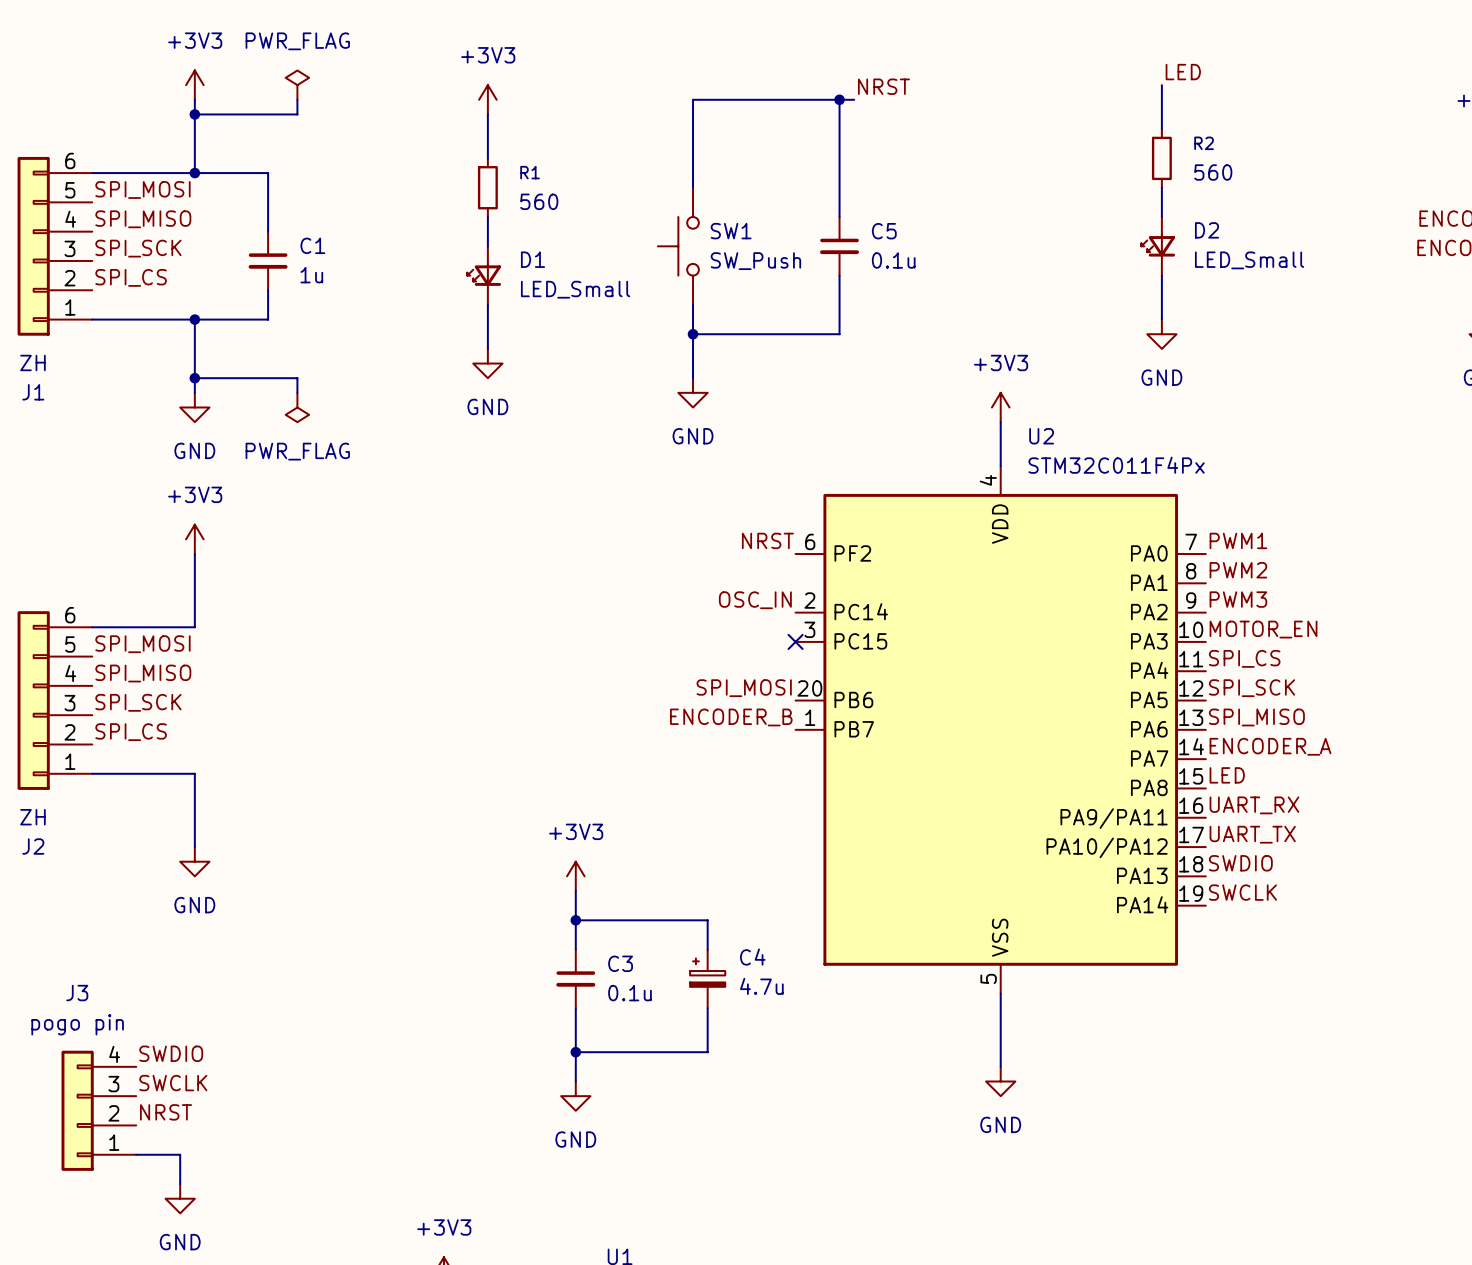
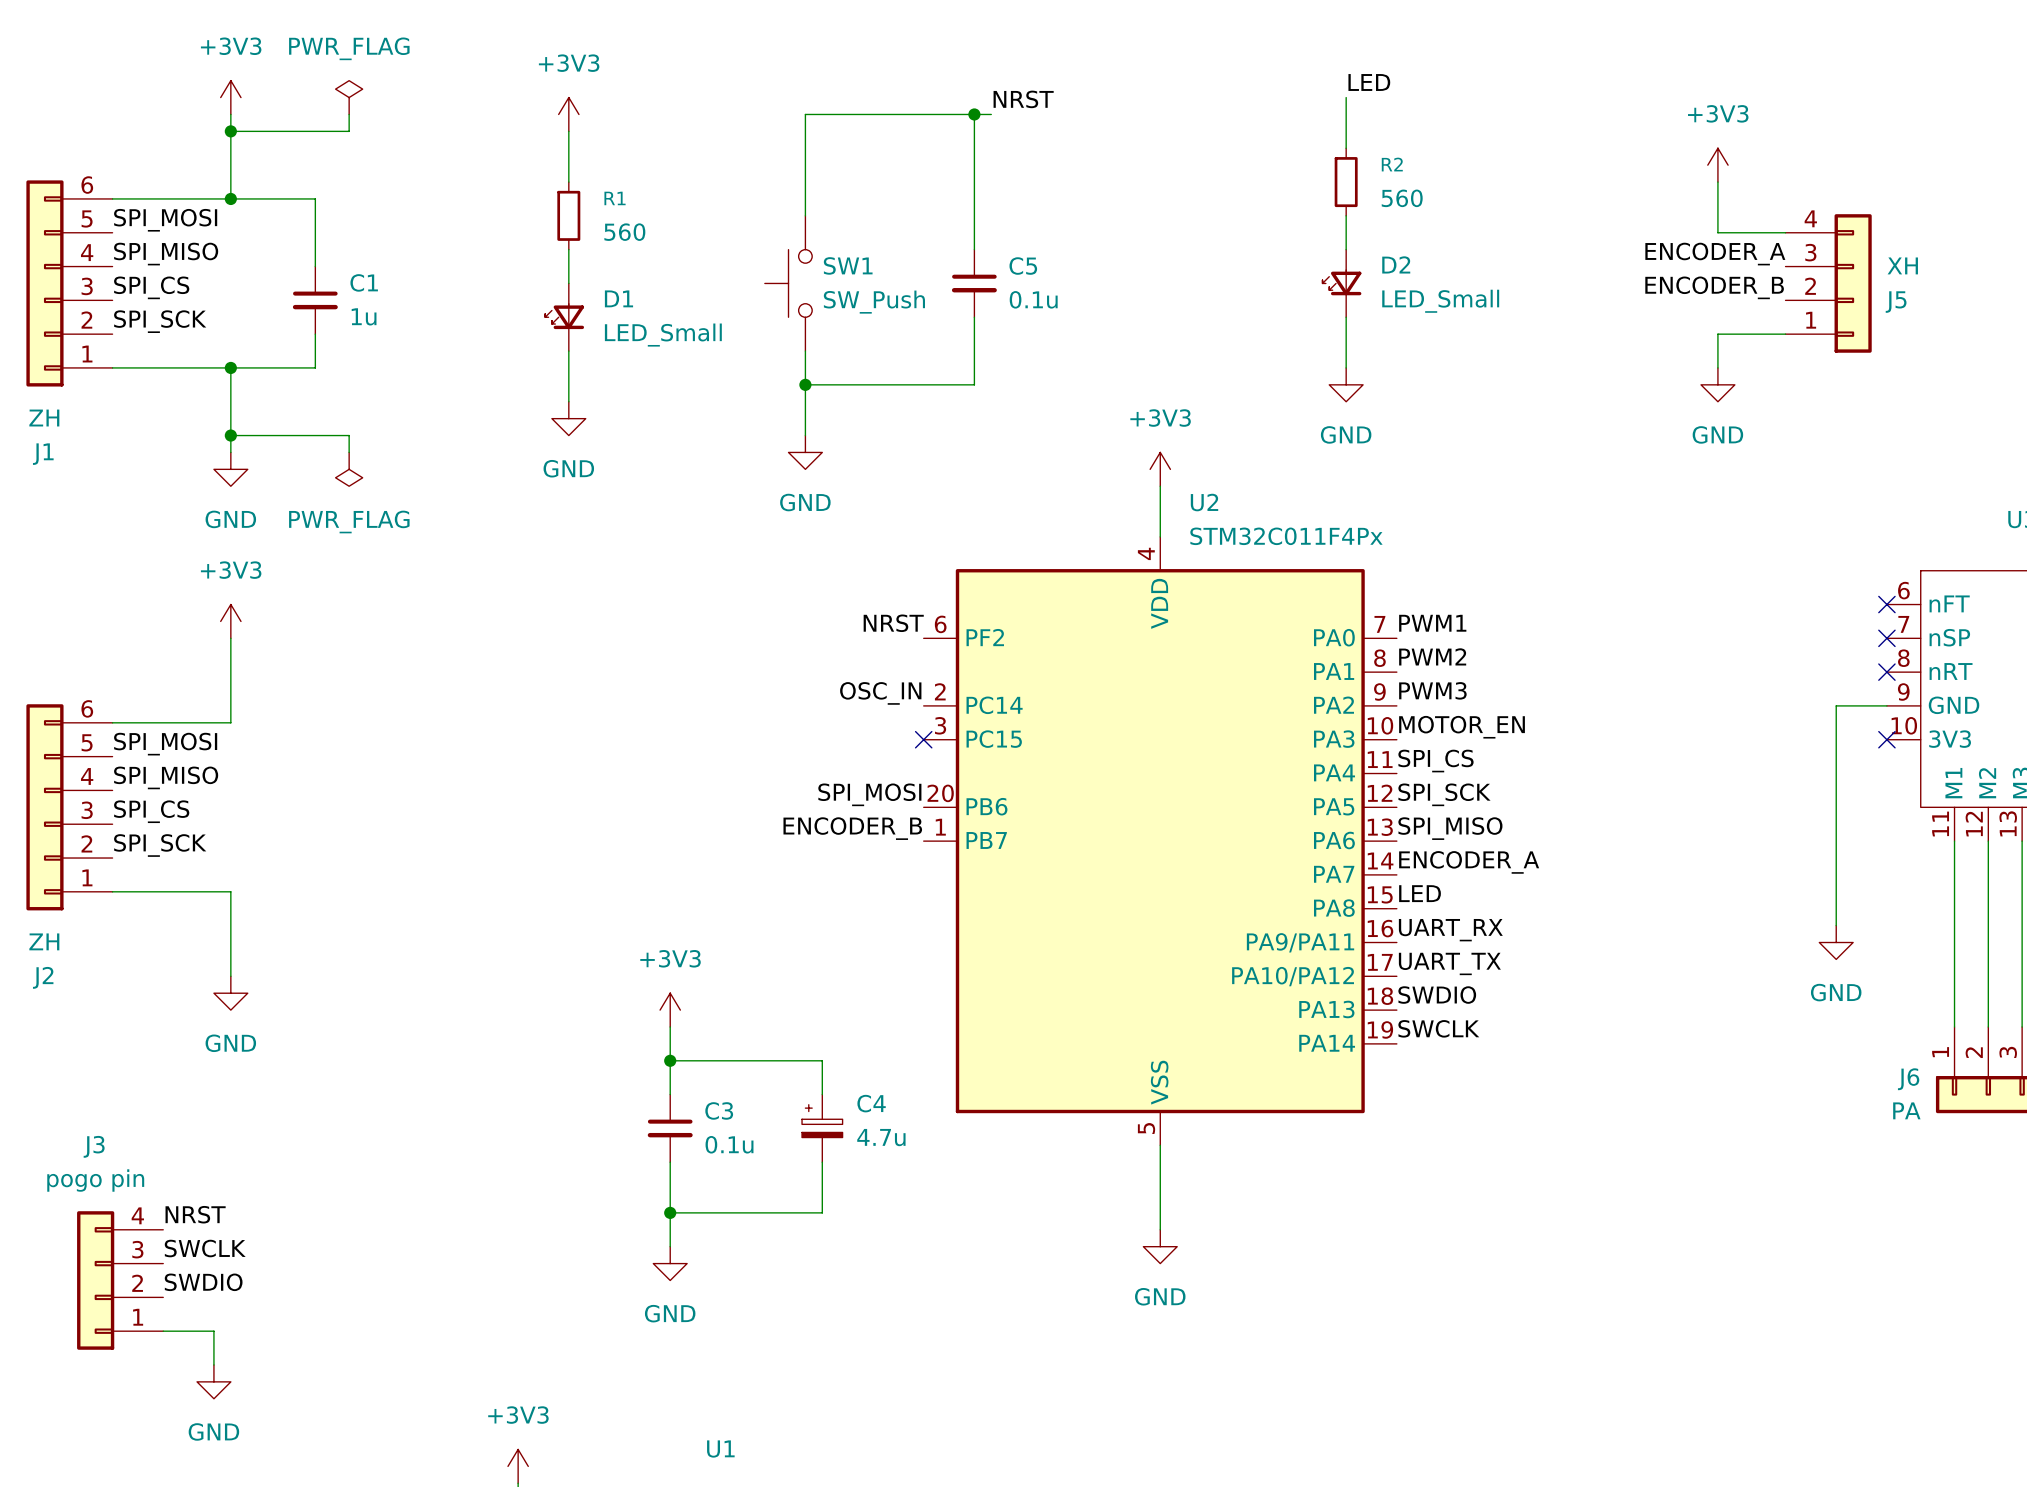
label: SPI_SCK (138, 248) -> SPI_CS (151, 287)
label: SPI_CS (131, 277) -> SPI_SCK (160, 321)
label: SPI_SCK (138, 702) -> SPI_CS (151, 811)
label: SPI_CS (131, 732) -> SPI_SCK (160, 845)
label: SWDIO (171, 1053) -> NRST (195, 1214)
label: NRST (166, 1112) -> SWDIO (203, 1282)

